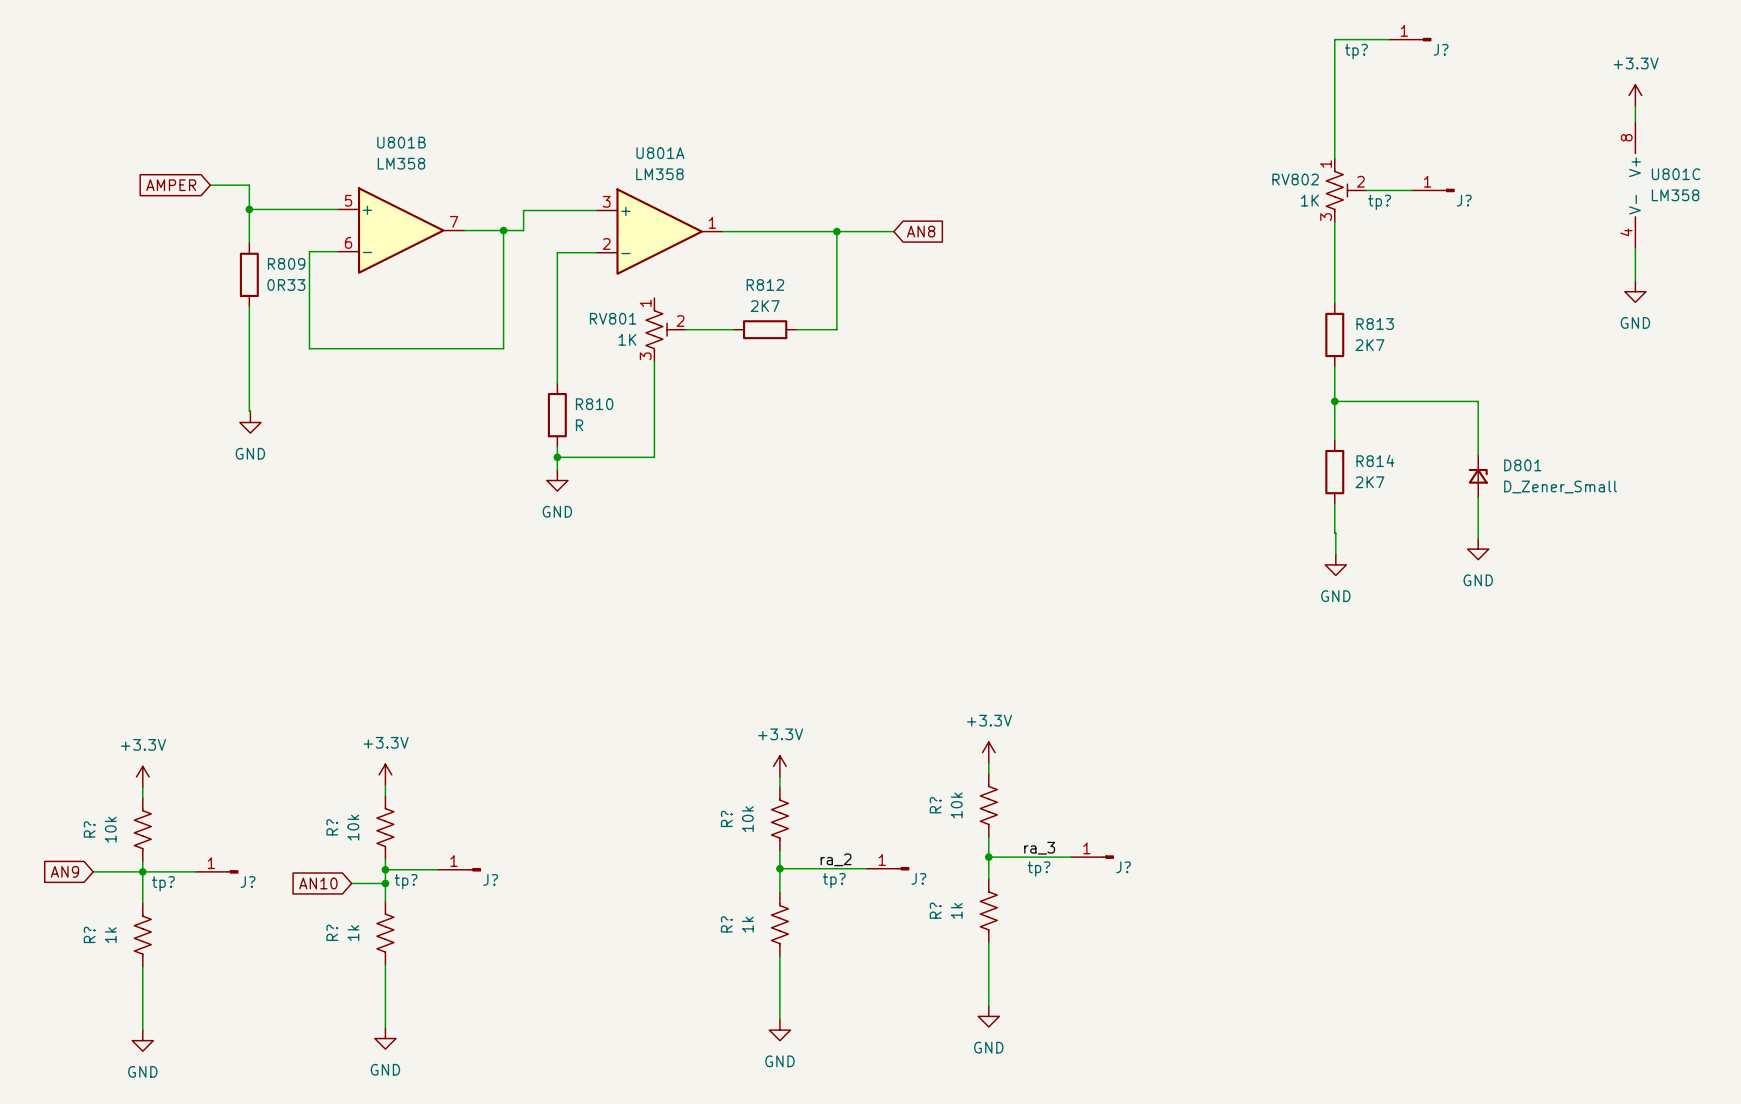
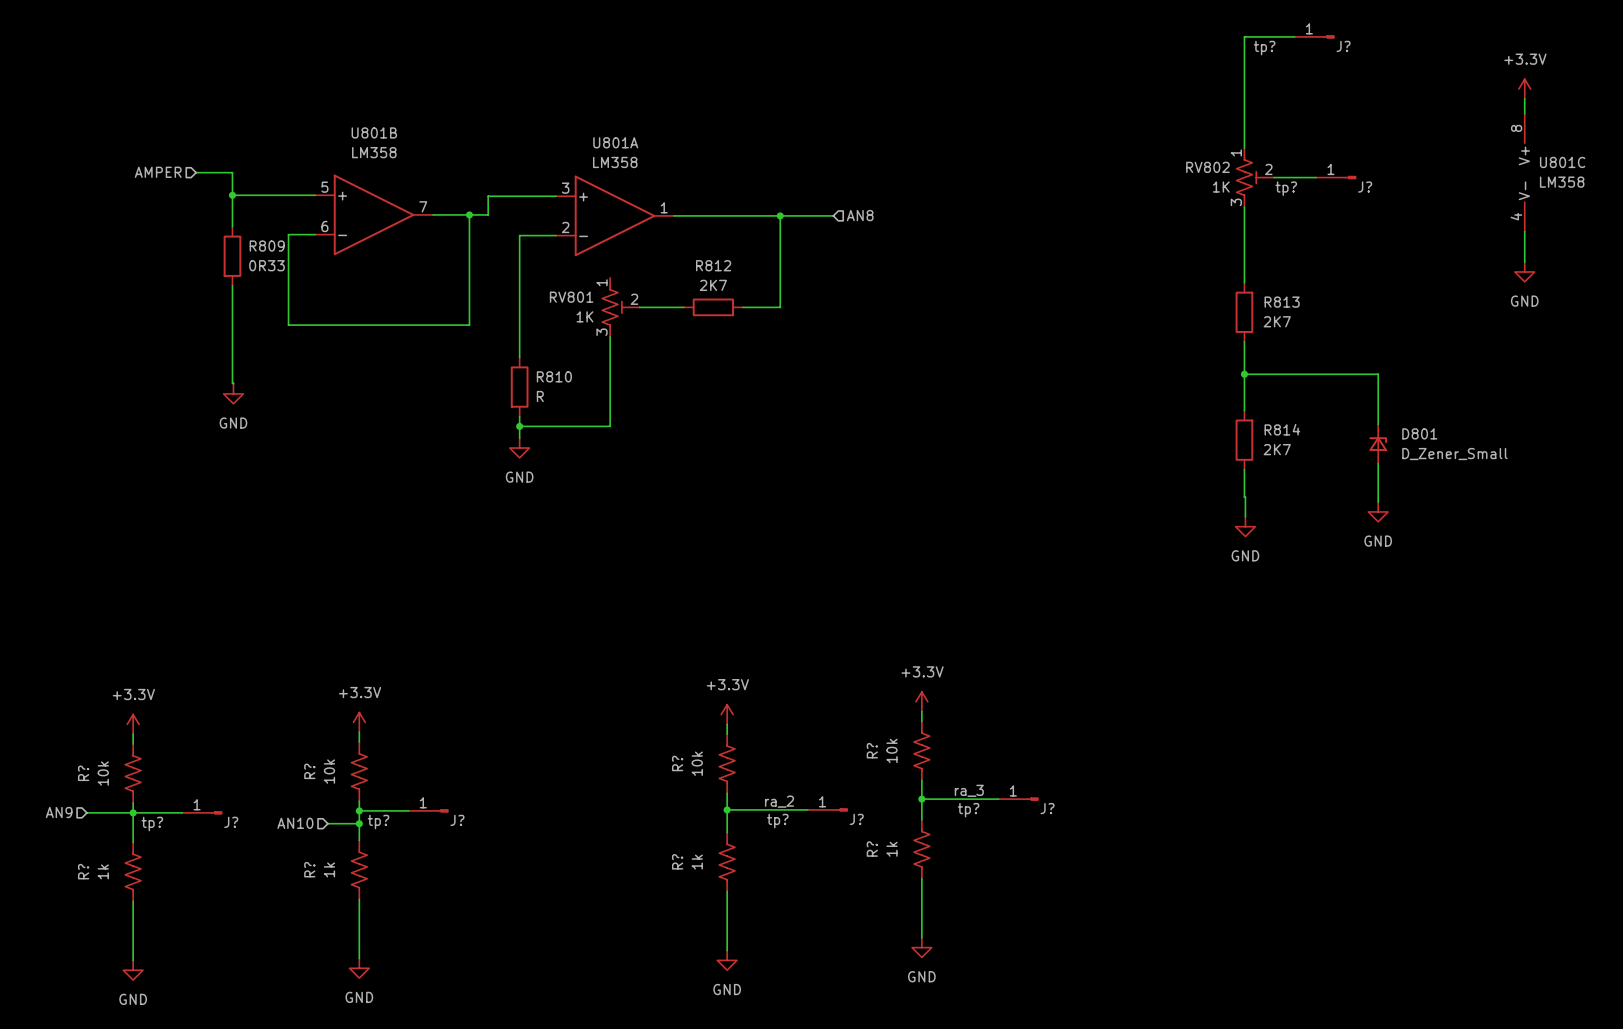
hierarchical label: none -> AMPER (158, 172)
global label: AMPER (171, 185) -> none
global label: AN8 (921, 231) -> none
hierarchical label: none -> AN8 (860, 215)
hierarchical label: none -> AN9 (59, 812)
global label: AN9 (64, 871) -> none
hierarchical label: none -> AN10 (295, 823)
global label: AN10 (318, 883) -> none

